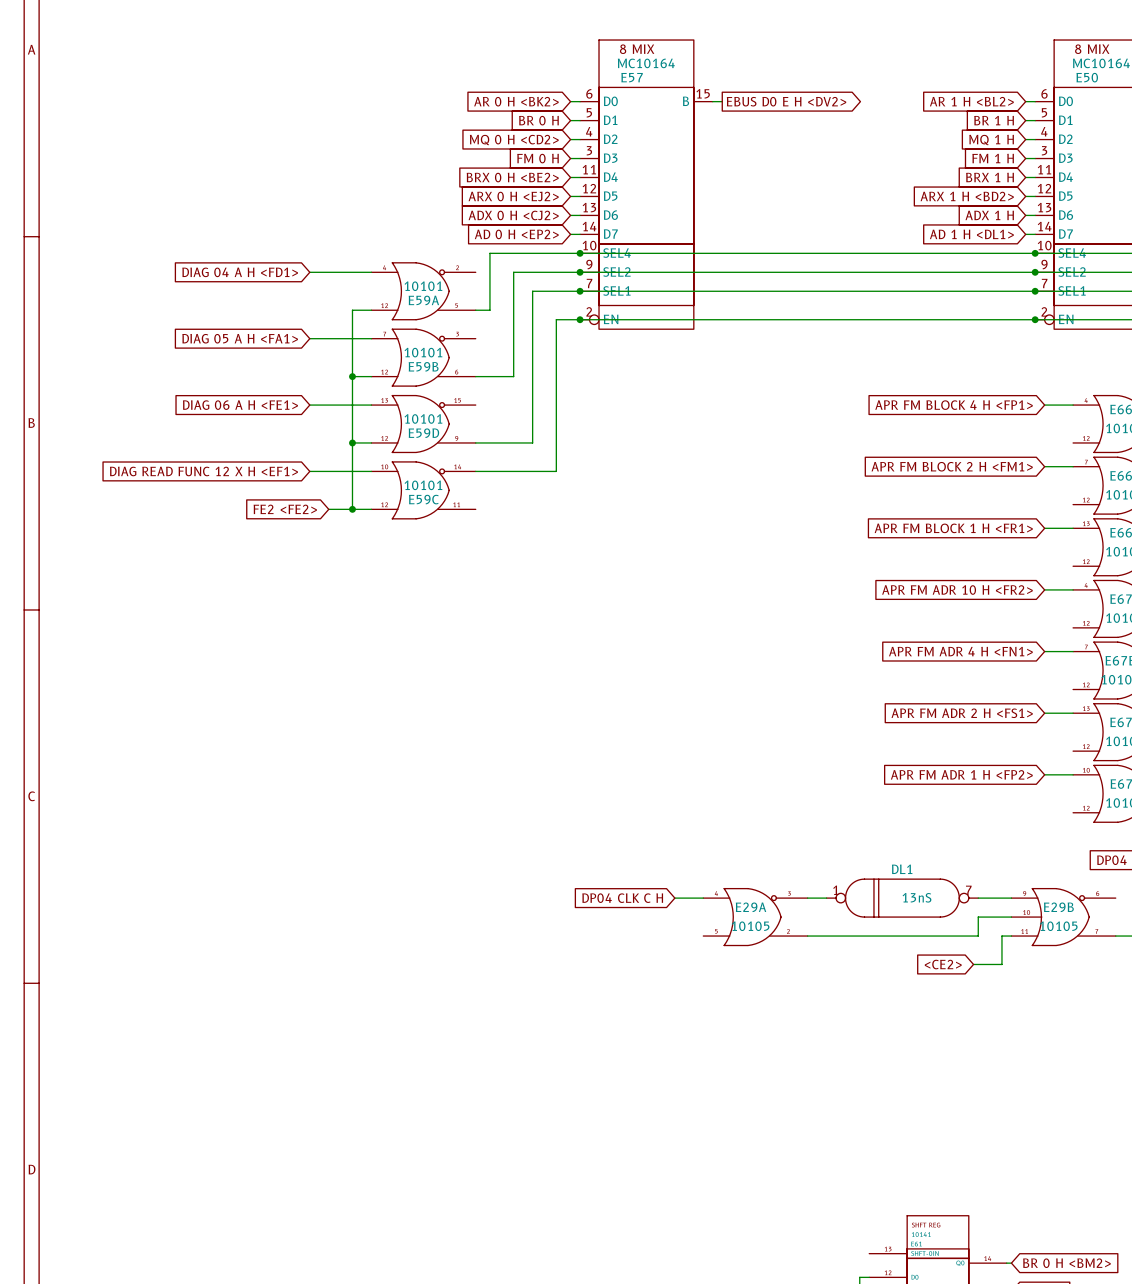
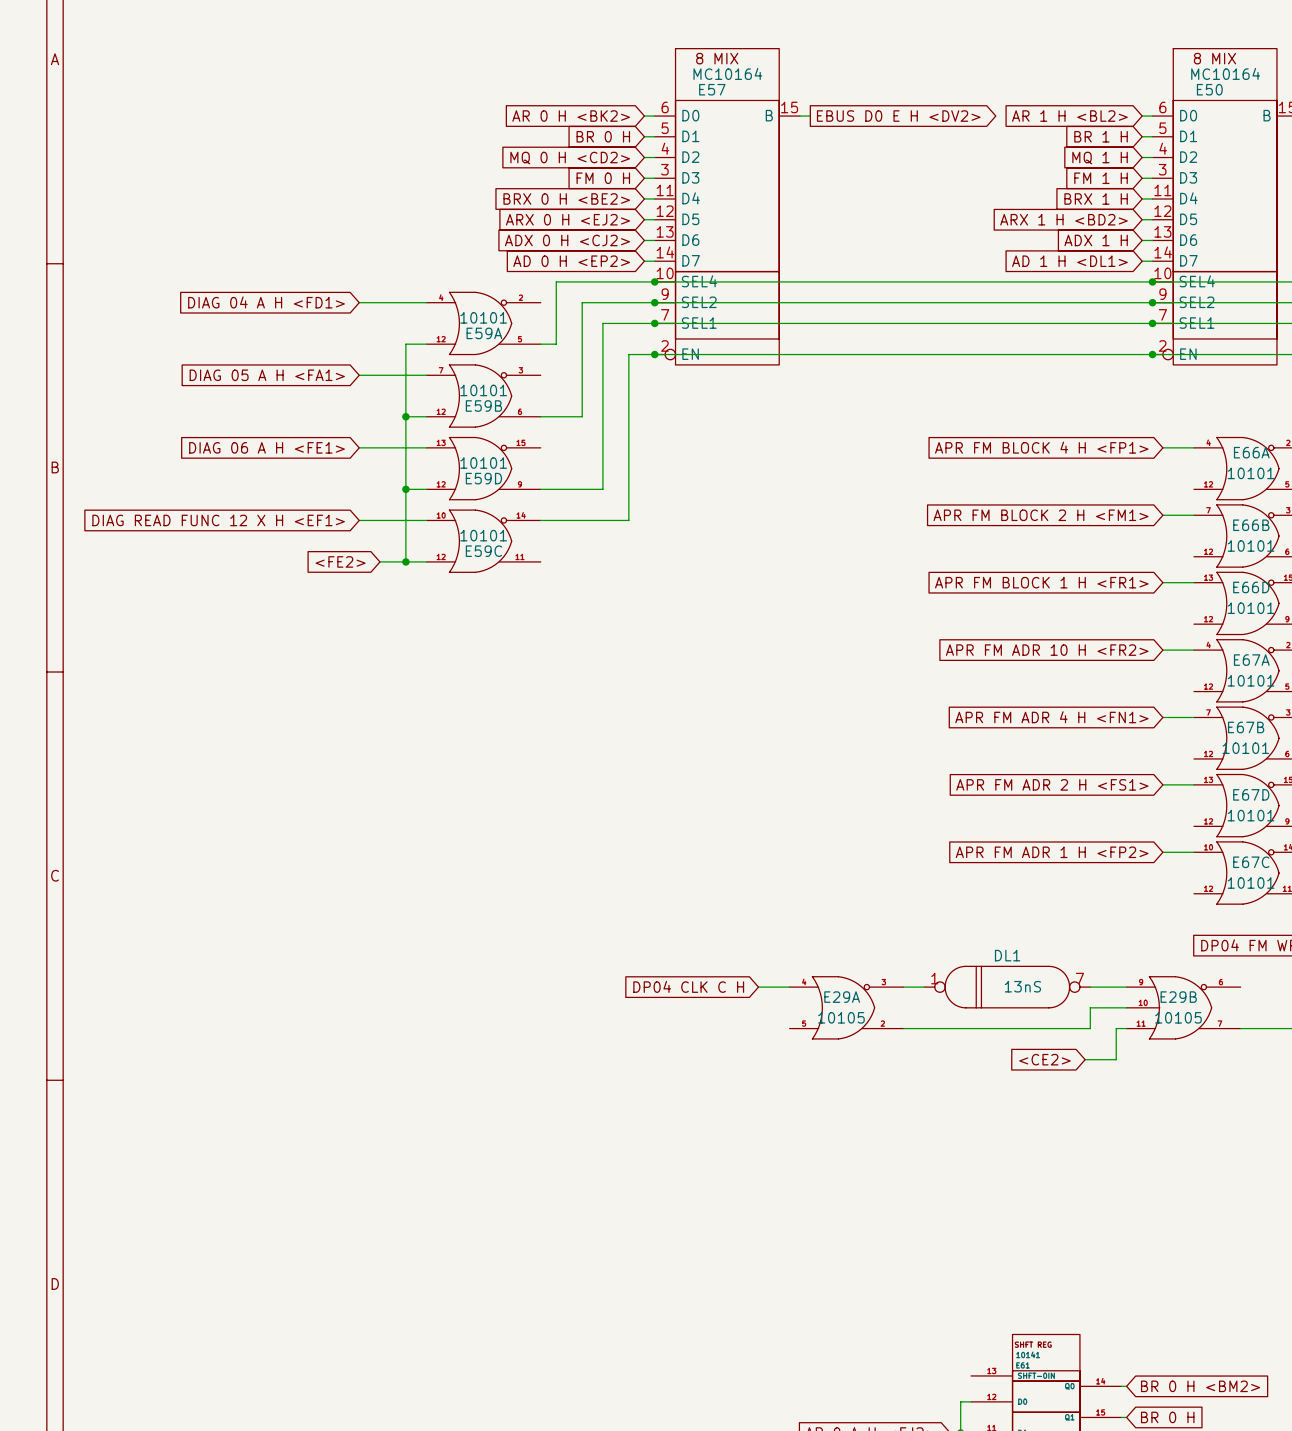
global label: FE2 <FE2> (285, 509) -> <FE2> (340, 561)

